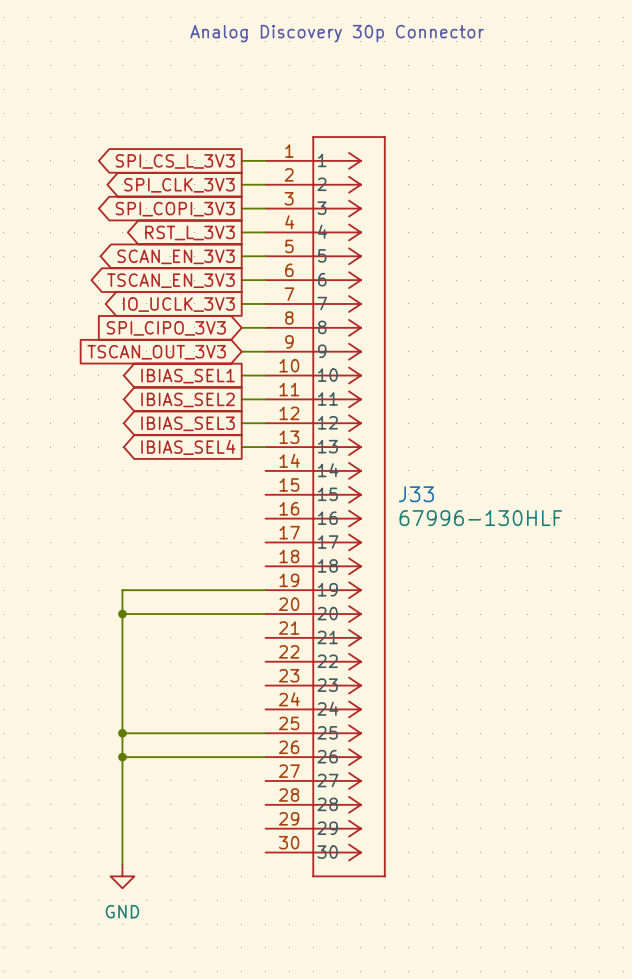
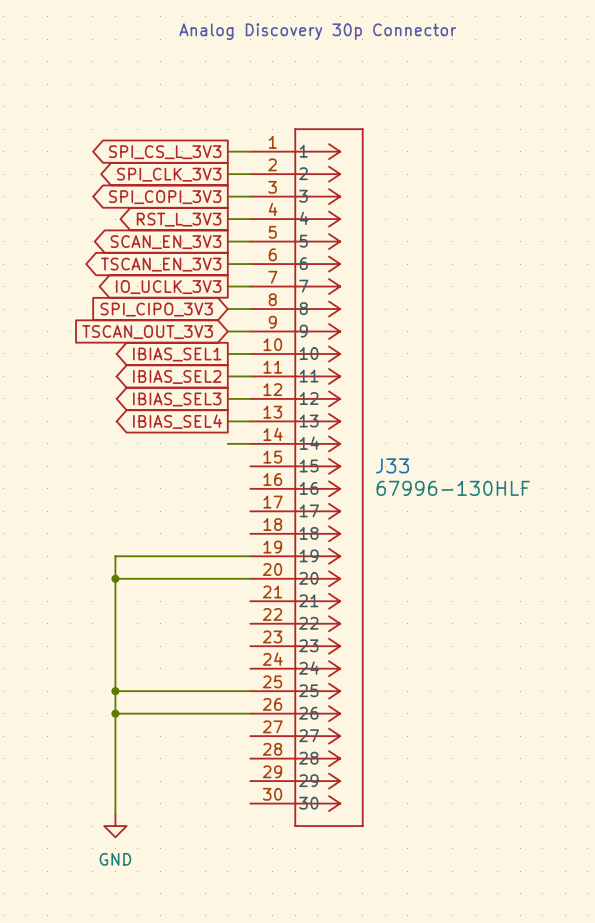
wire: none -> (227, 443) (250, 443)

